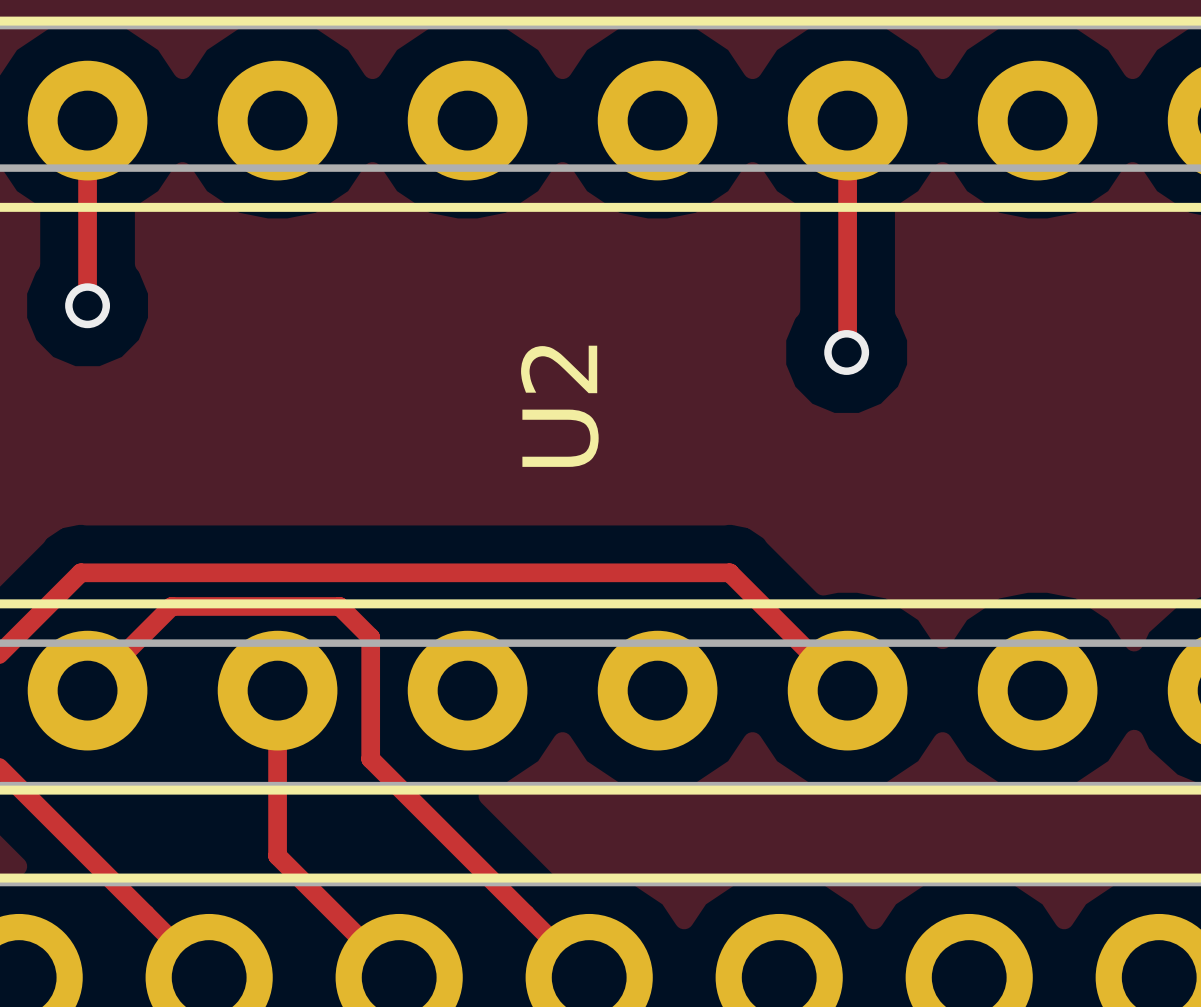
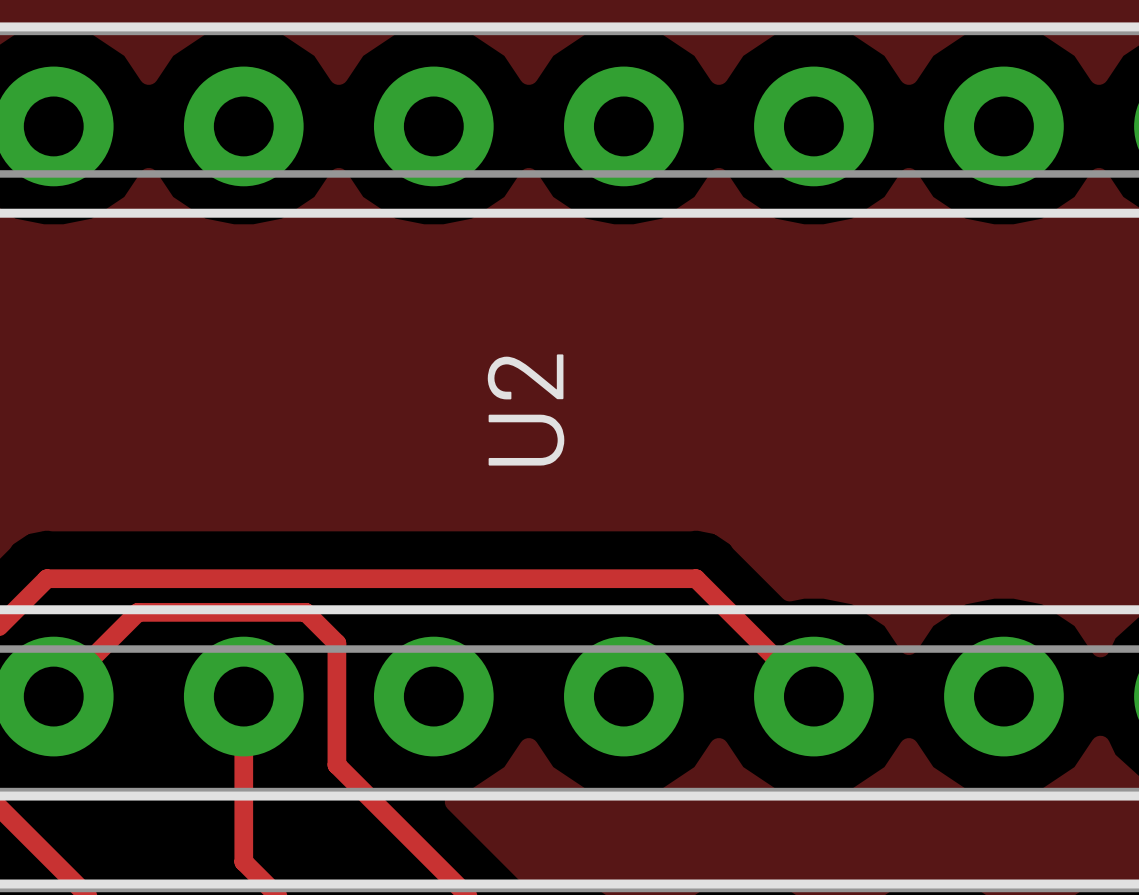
track: (87, 120) (87, 305) -> none
track: (847, 120) (847, 351) -> none
via: (87, 305) -> none
via: (846, 352) -> none

